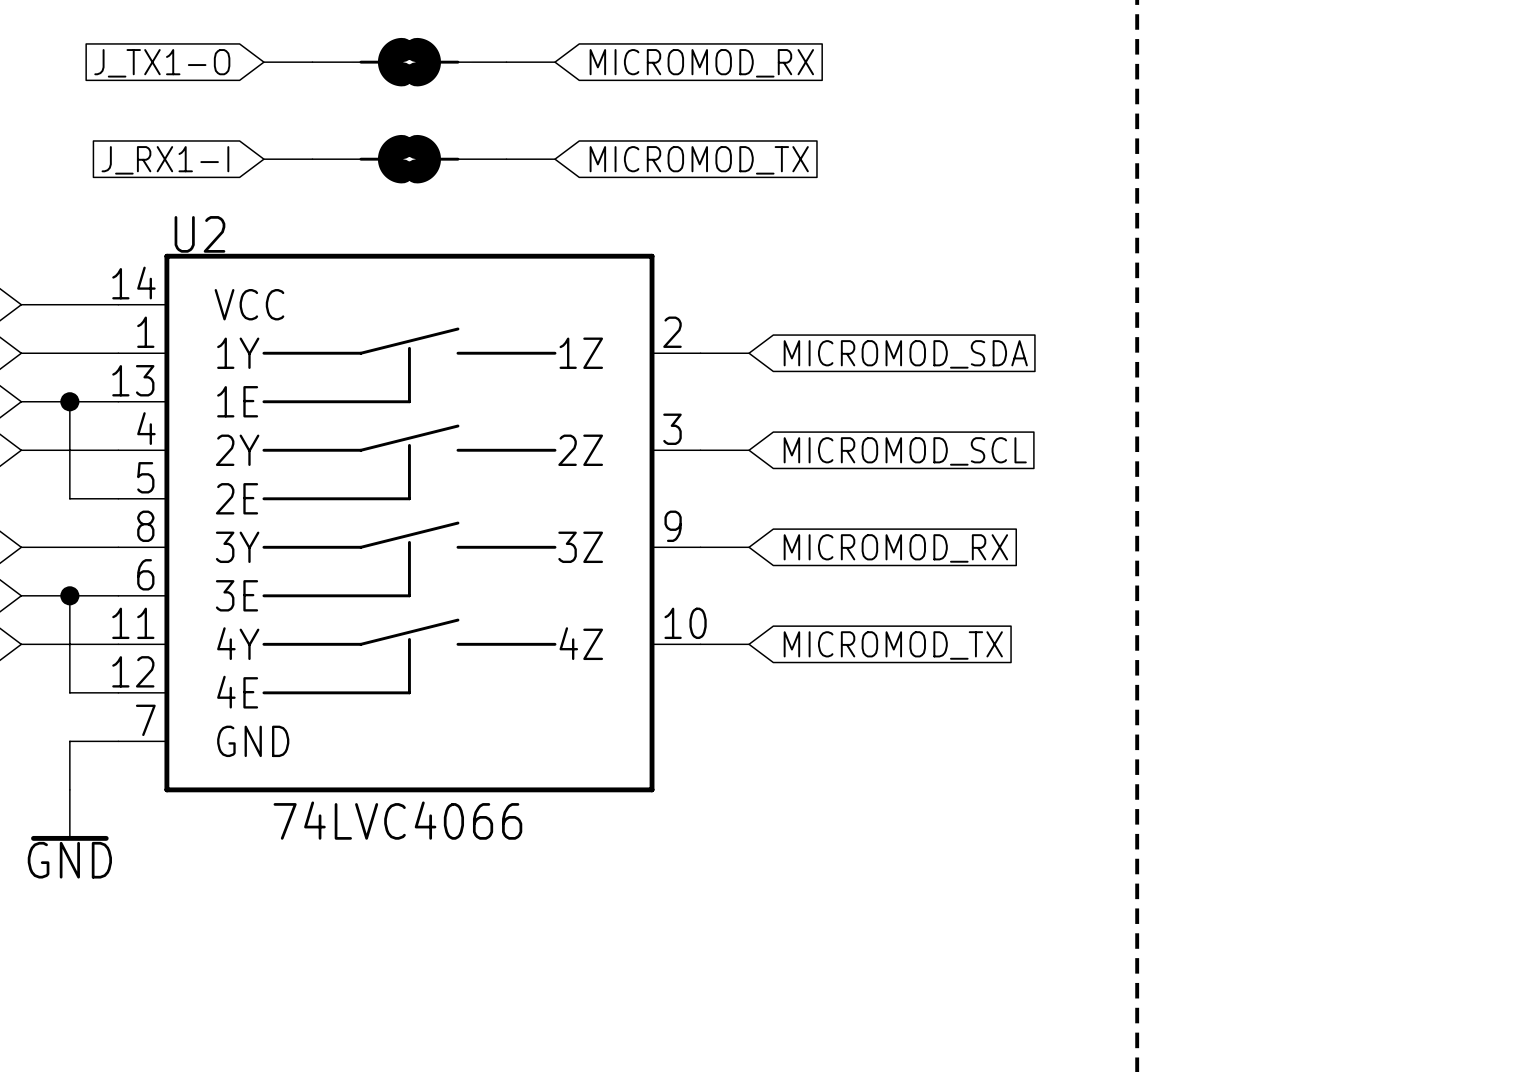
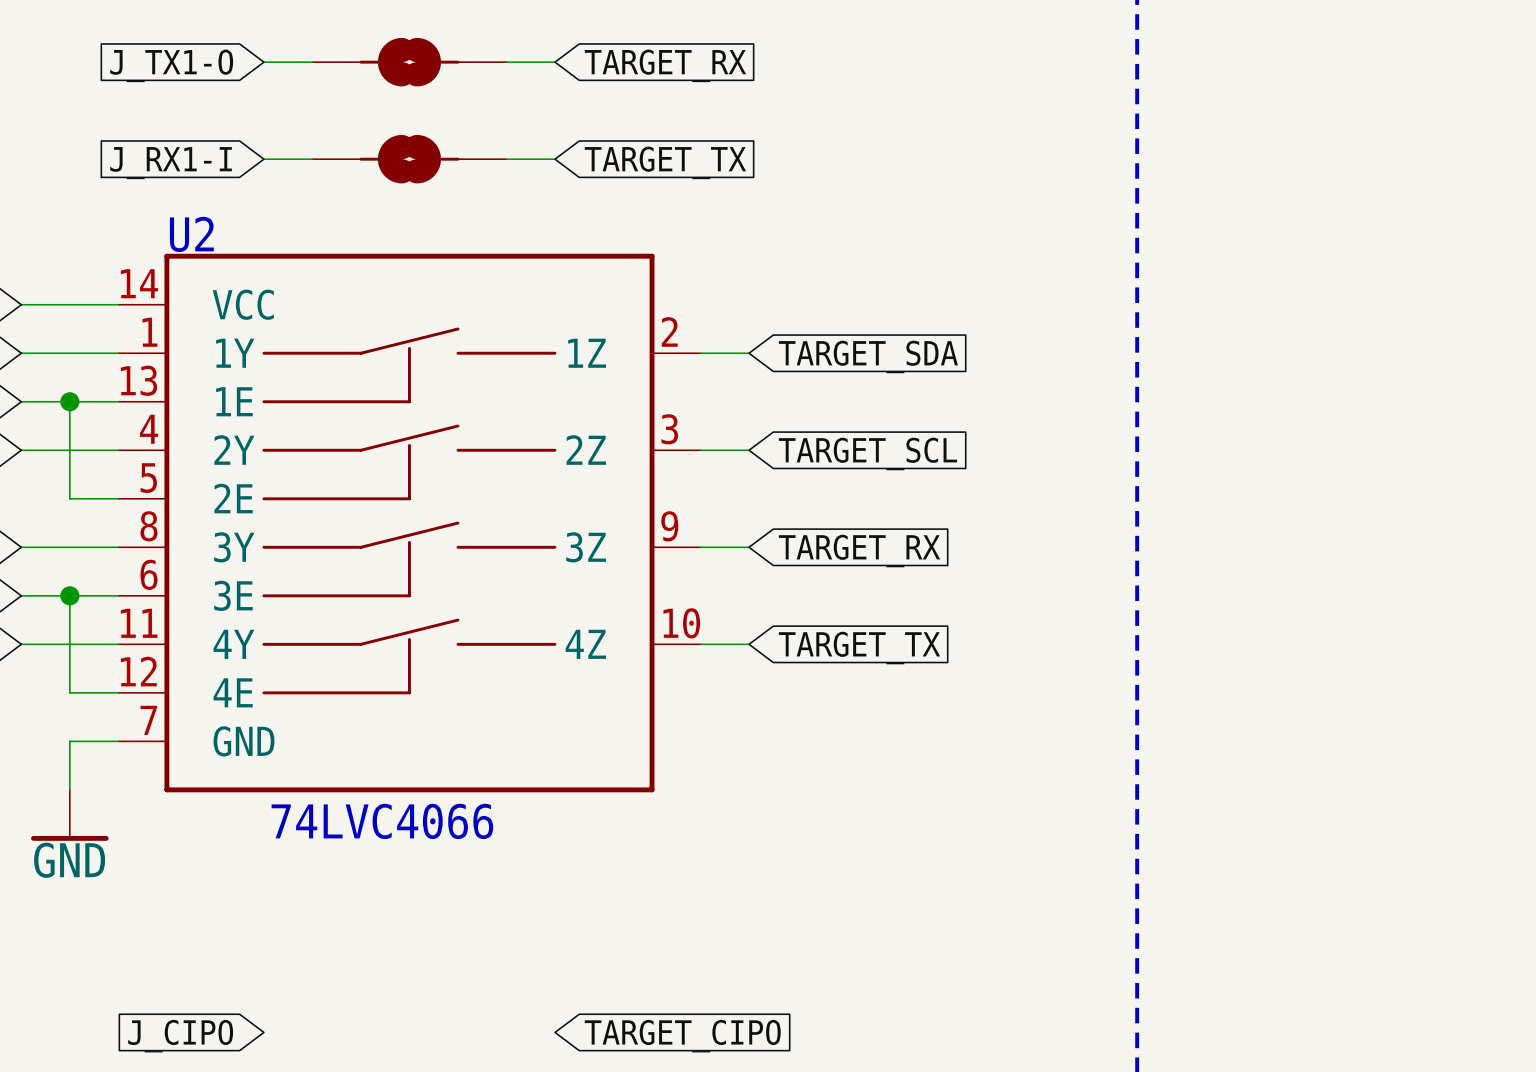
global label: MICROMOD_RX (701, 63) -> TARGET_RX (665, 65)
global label: MICROMOD_TX (699, 160) -> TARGET_TX (665, 162)
global label: MICROMOD_SDA (905, 354) -> TARGET_SDA (868, 356)
global label: MICROMOD_SCL (905, 451) -> TARGET_SCL (867, 453)
global label: MICROMOD_RX (895, 548) -> TARGET_RX (859, 551)
global label: MICROMOD_TX (893, 645) -> TARGET_TX (859, 648)
global label: none -> J_CIPO (180, 1036)
global label: none -> TARGET_CIPO (682, 1036)

